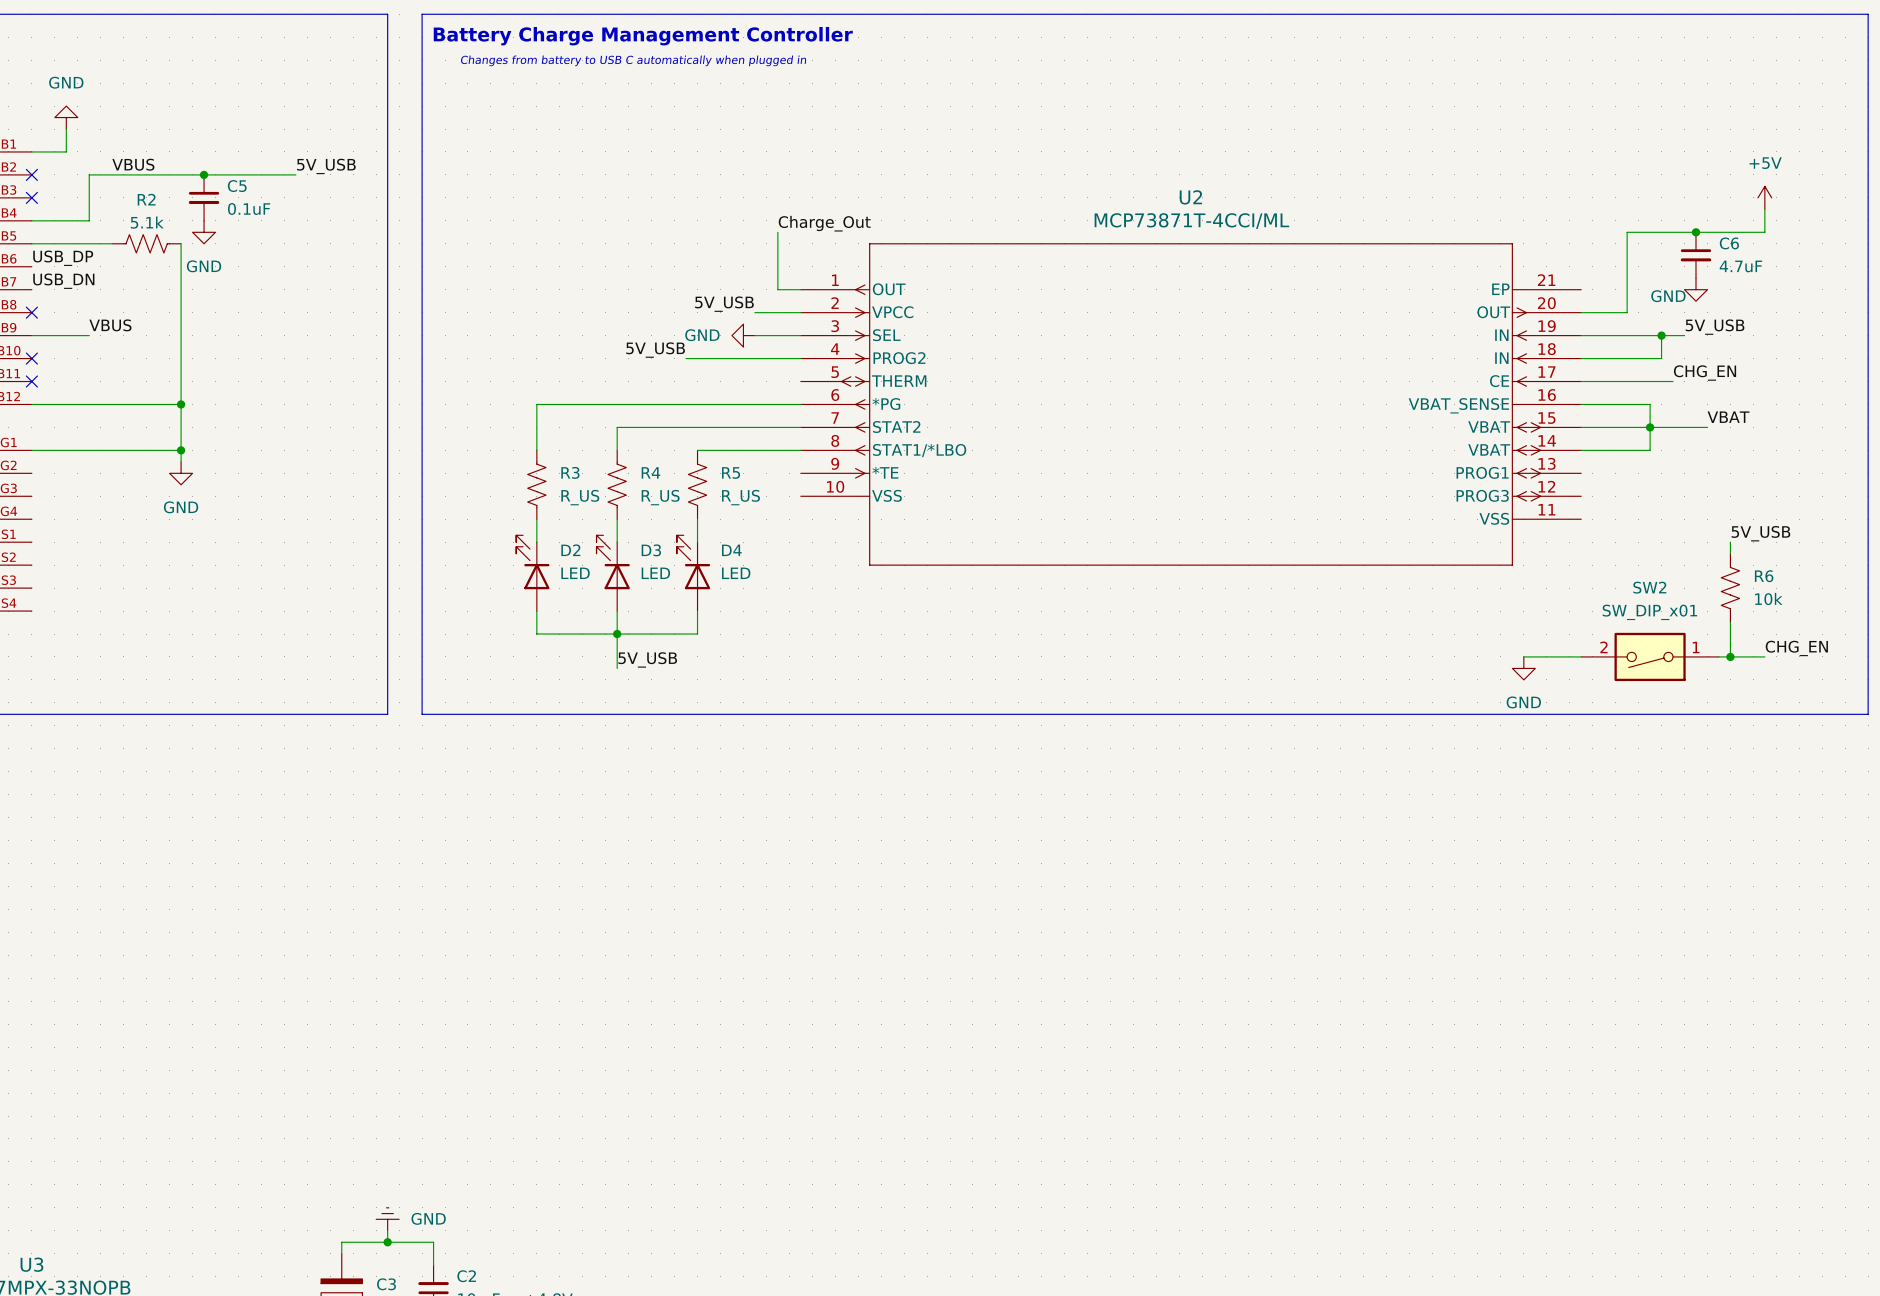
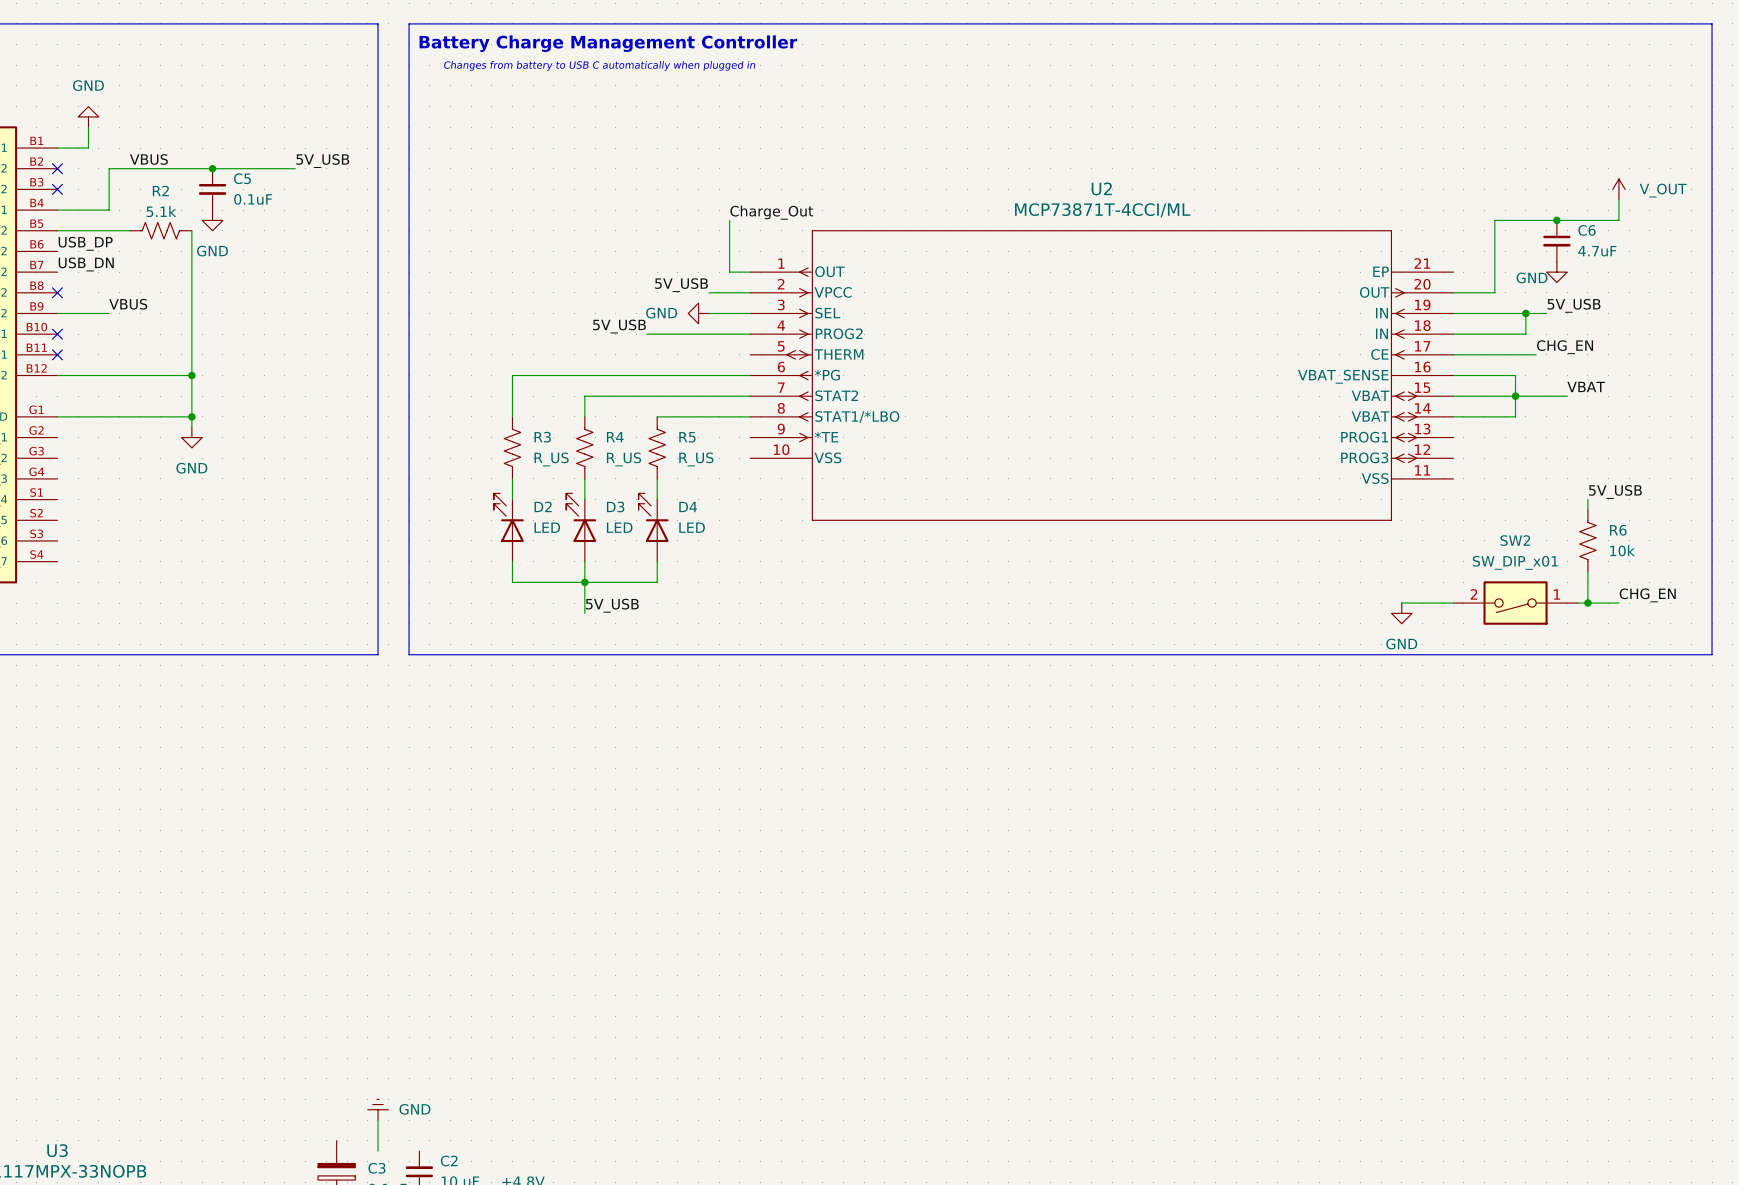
power symbol: +5V (1764, 197) -> V_OUT (1618, 189)
wire: none -> (378, 1130) (378, 1151)
junction: (387, 1242) -> none
wire: (341, 1253) (341, 1242) (433, 1242) (433, 1265) -> none

